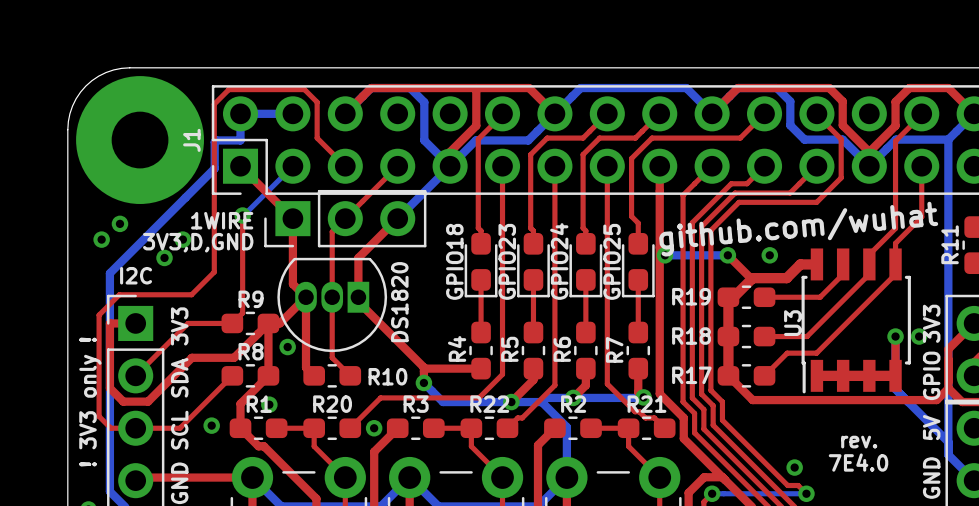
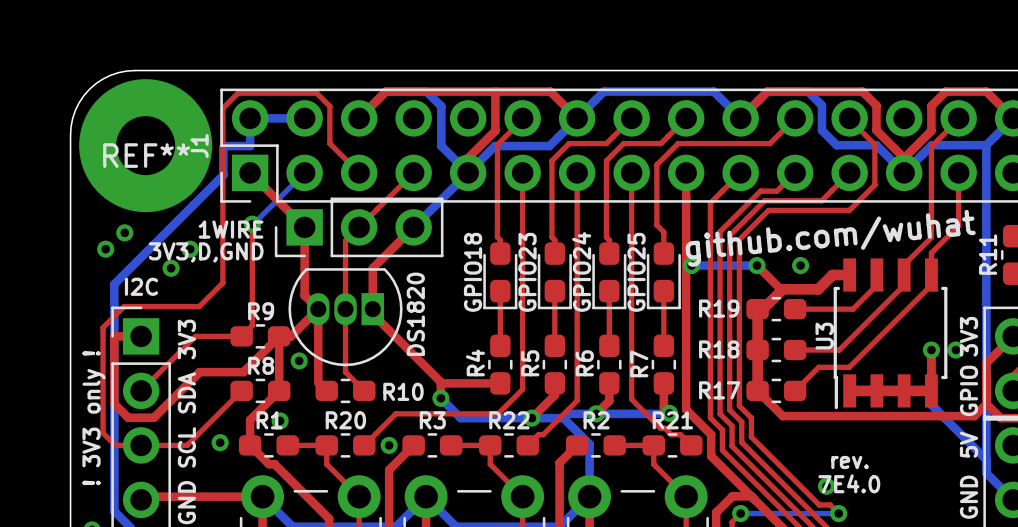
REF** name: none -> REF** (146, 155)
text position: rev. (859, 442) -> rev. (850, 462)
text position: 7E4.0 (858, 462) -> 7E4.0 (849, 483)

